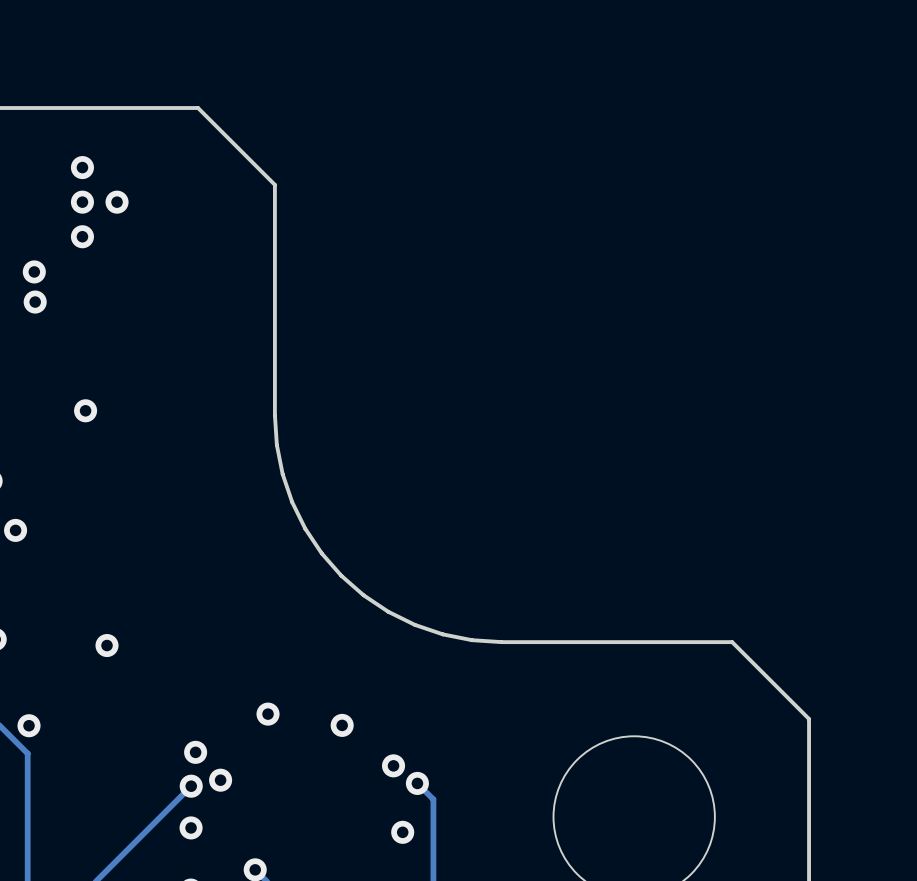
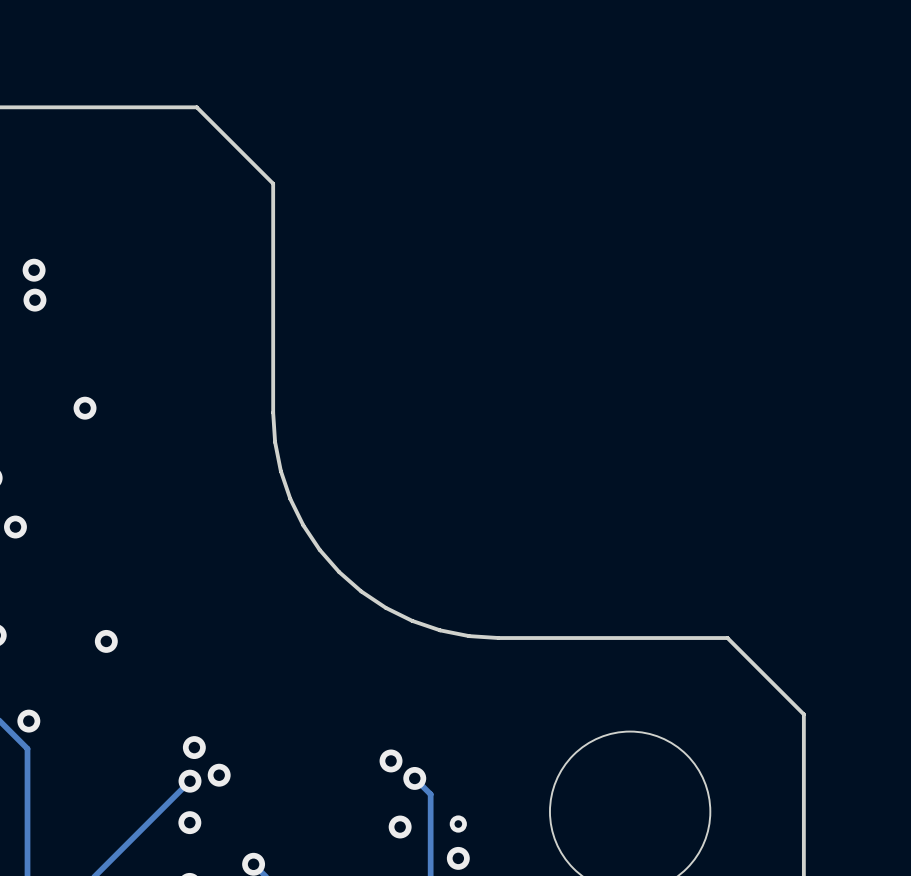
via: (82, 167) -> none
via: (82, 202) -> none
via: (117, 202) -> none
via: (82, 236) -> none
via: (268, 714) -> none
via: (342, 725) -> none
via: none -> (458, 824)
via: none -> (458, 858)

